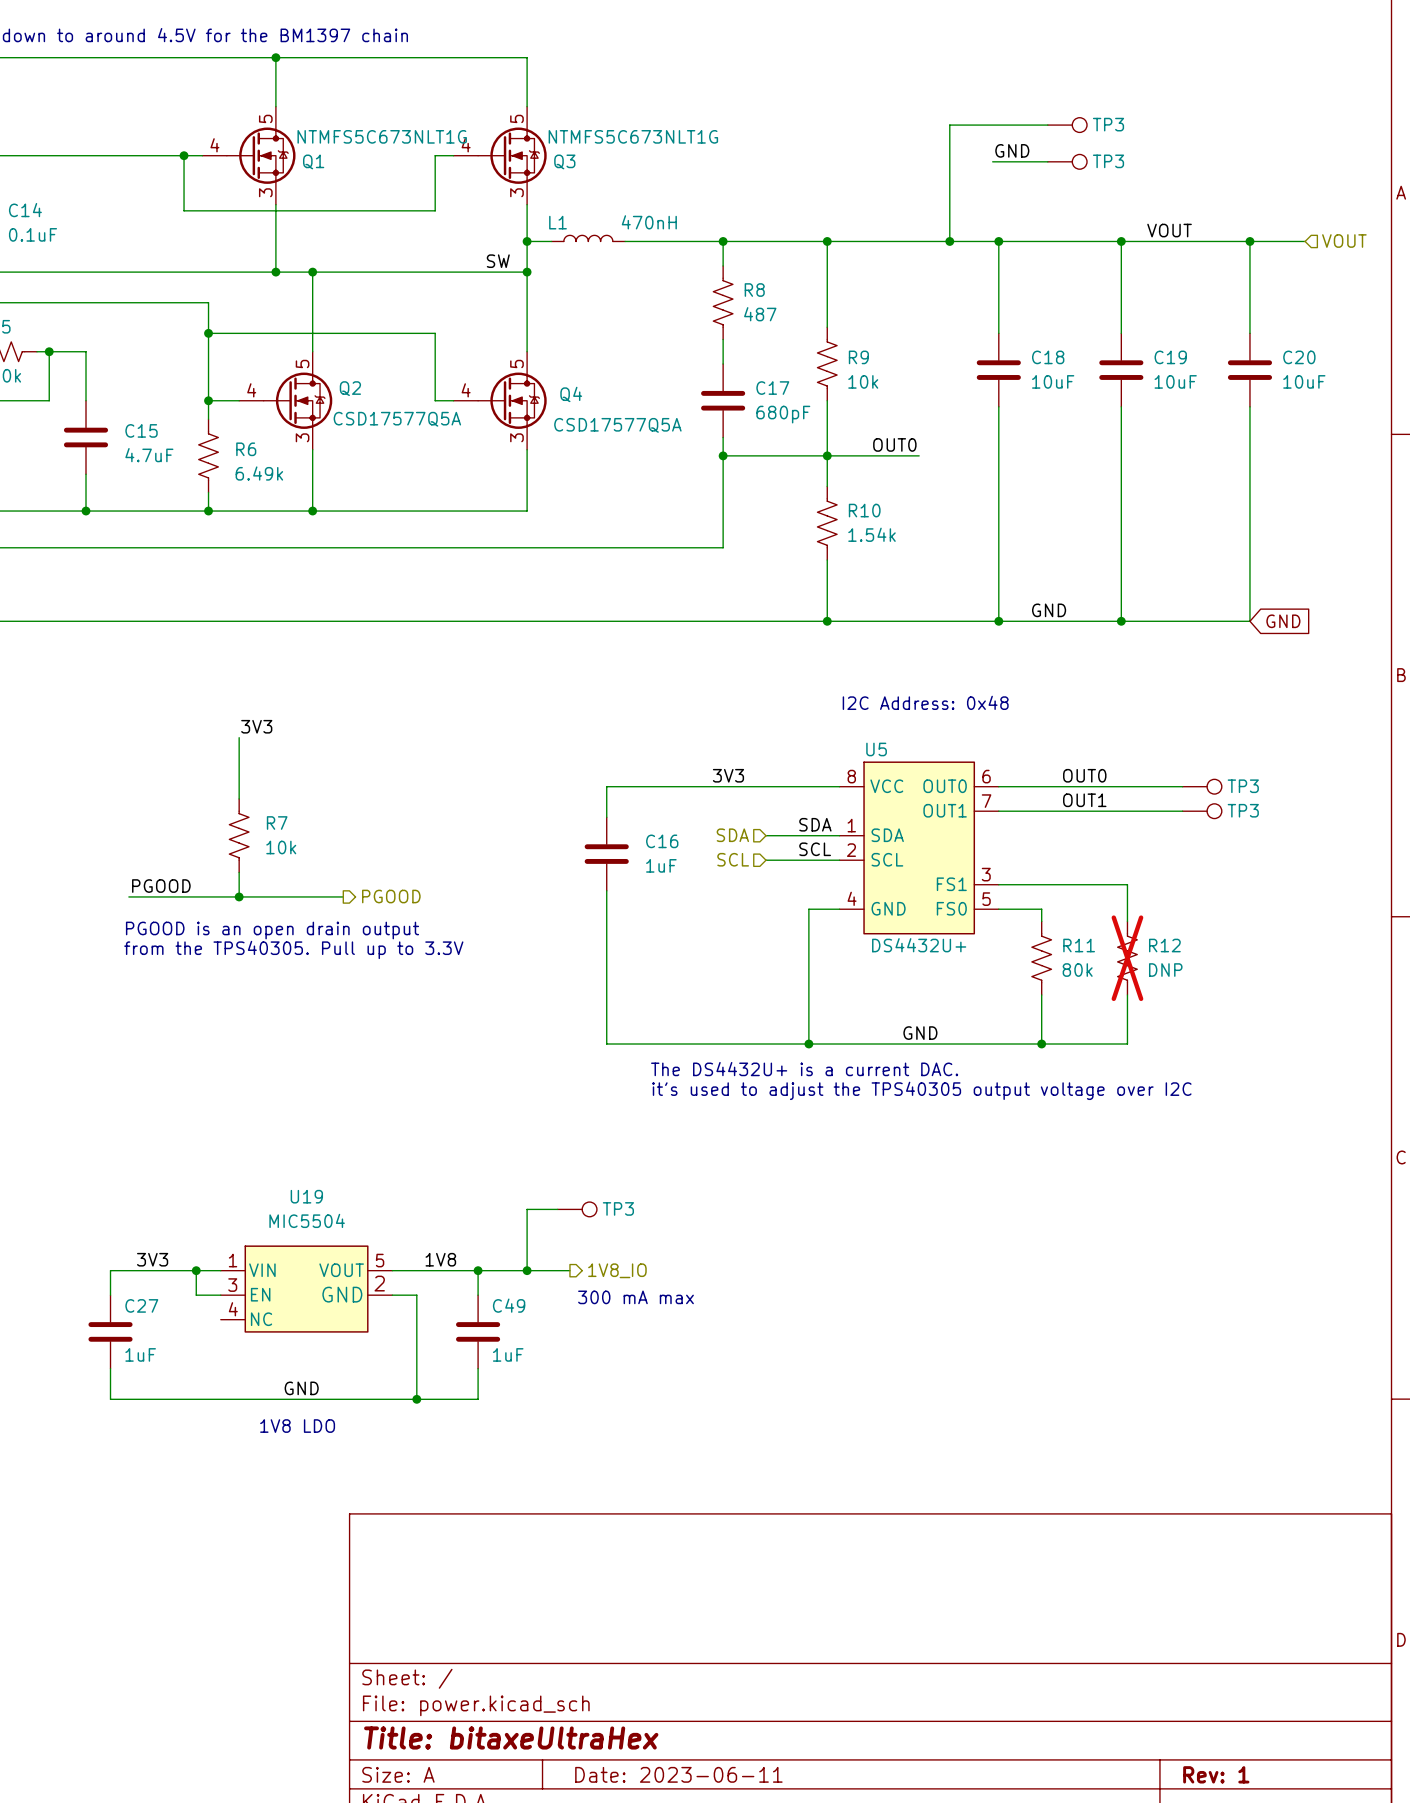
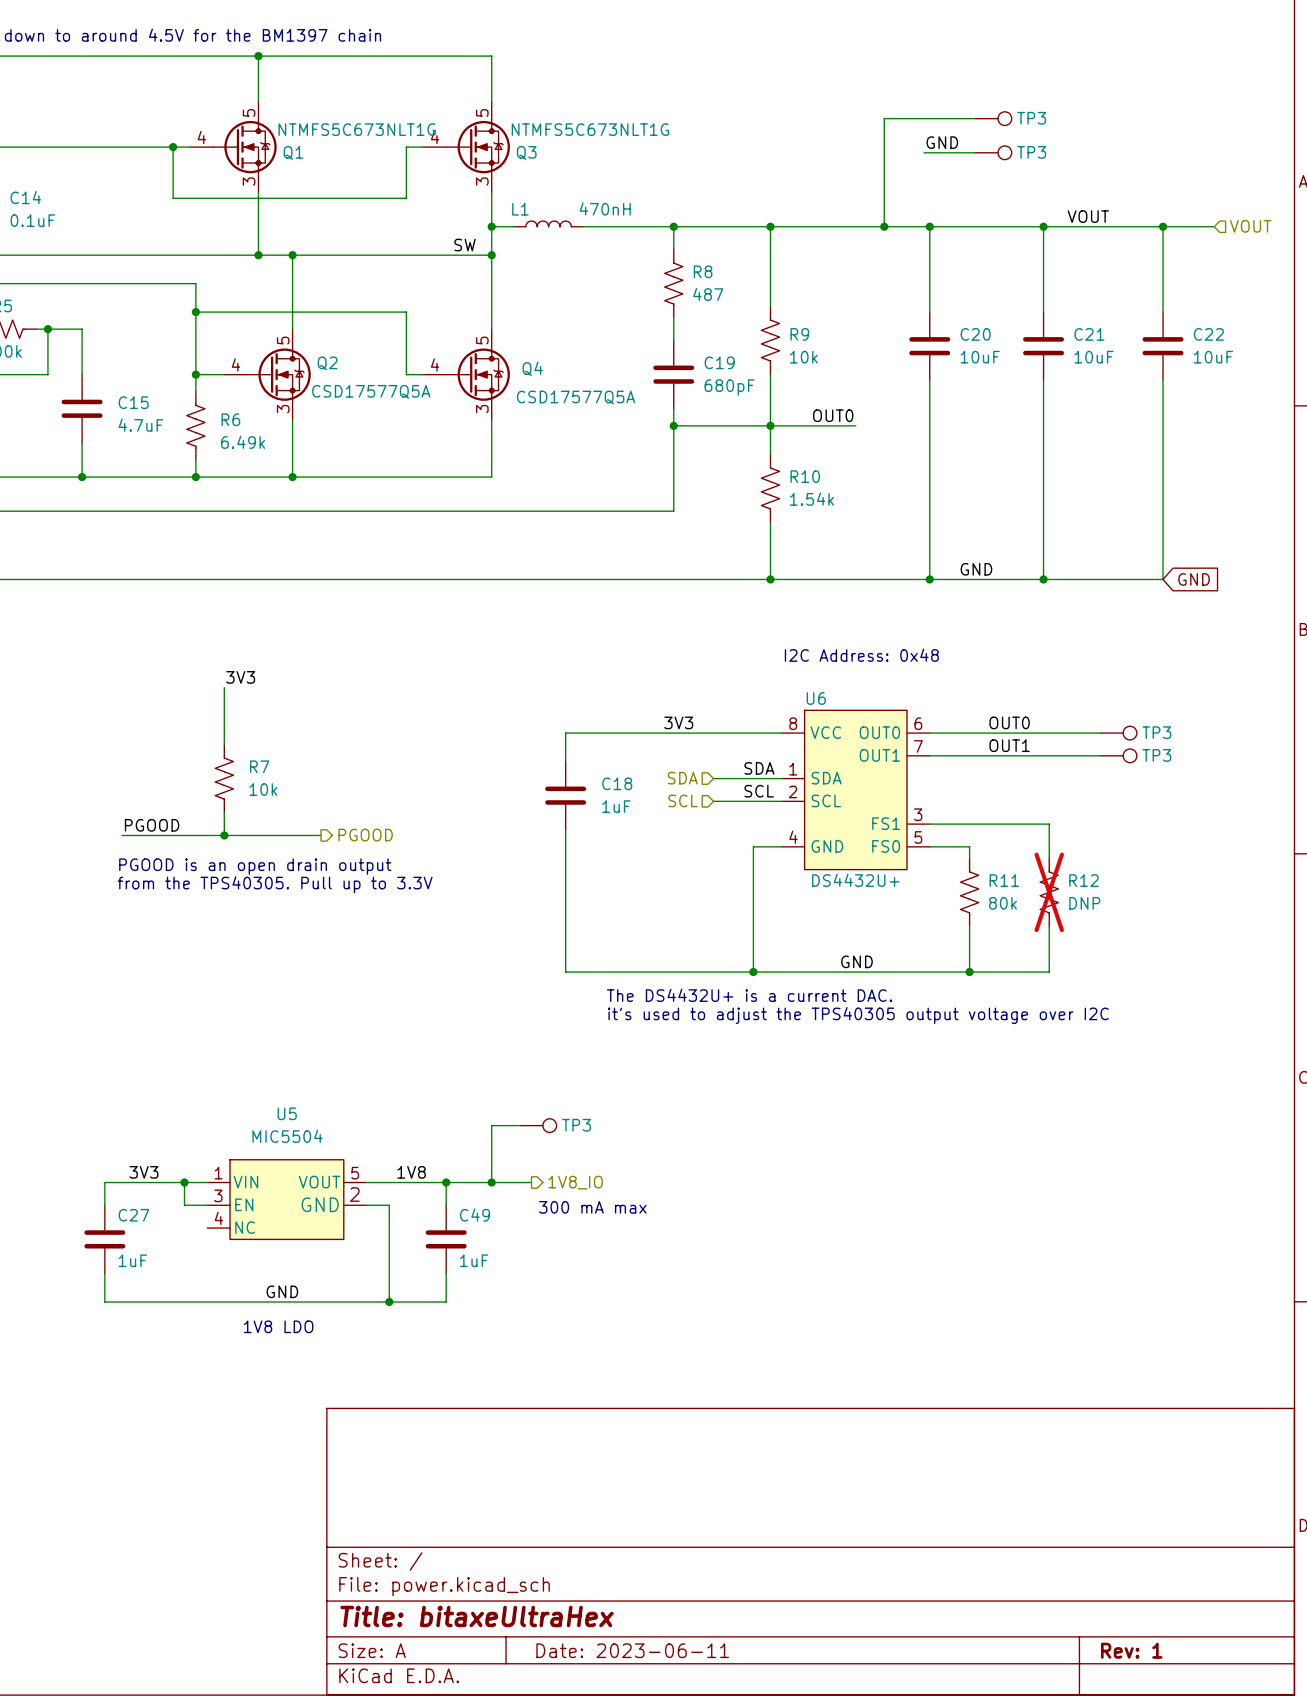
C18 name: C18 (1048, 357) -> C20 (975, 334)
C19 name: C19 (1170, 357) -> C21 (1089, 334)
C20 name: C20 (1299, 357) -> C22 (1208, 334)
C17 name: C17 (772, 388) -> C19 (719, 362)
U5 name: U5 (876, 749) -> U6 (816, 698)
C16 name: C16 (662, 841) -> C18 (617, 783)
U19 name: U19 (306, 1196) -> U5 (287, 1113)

